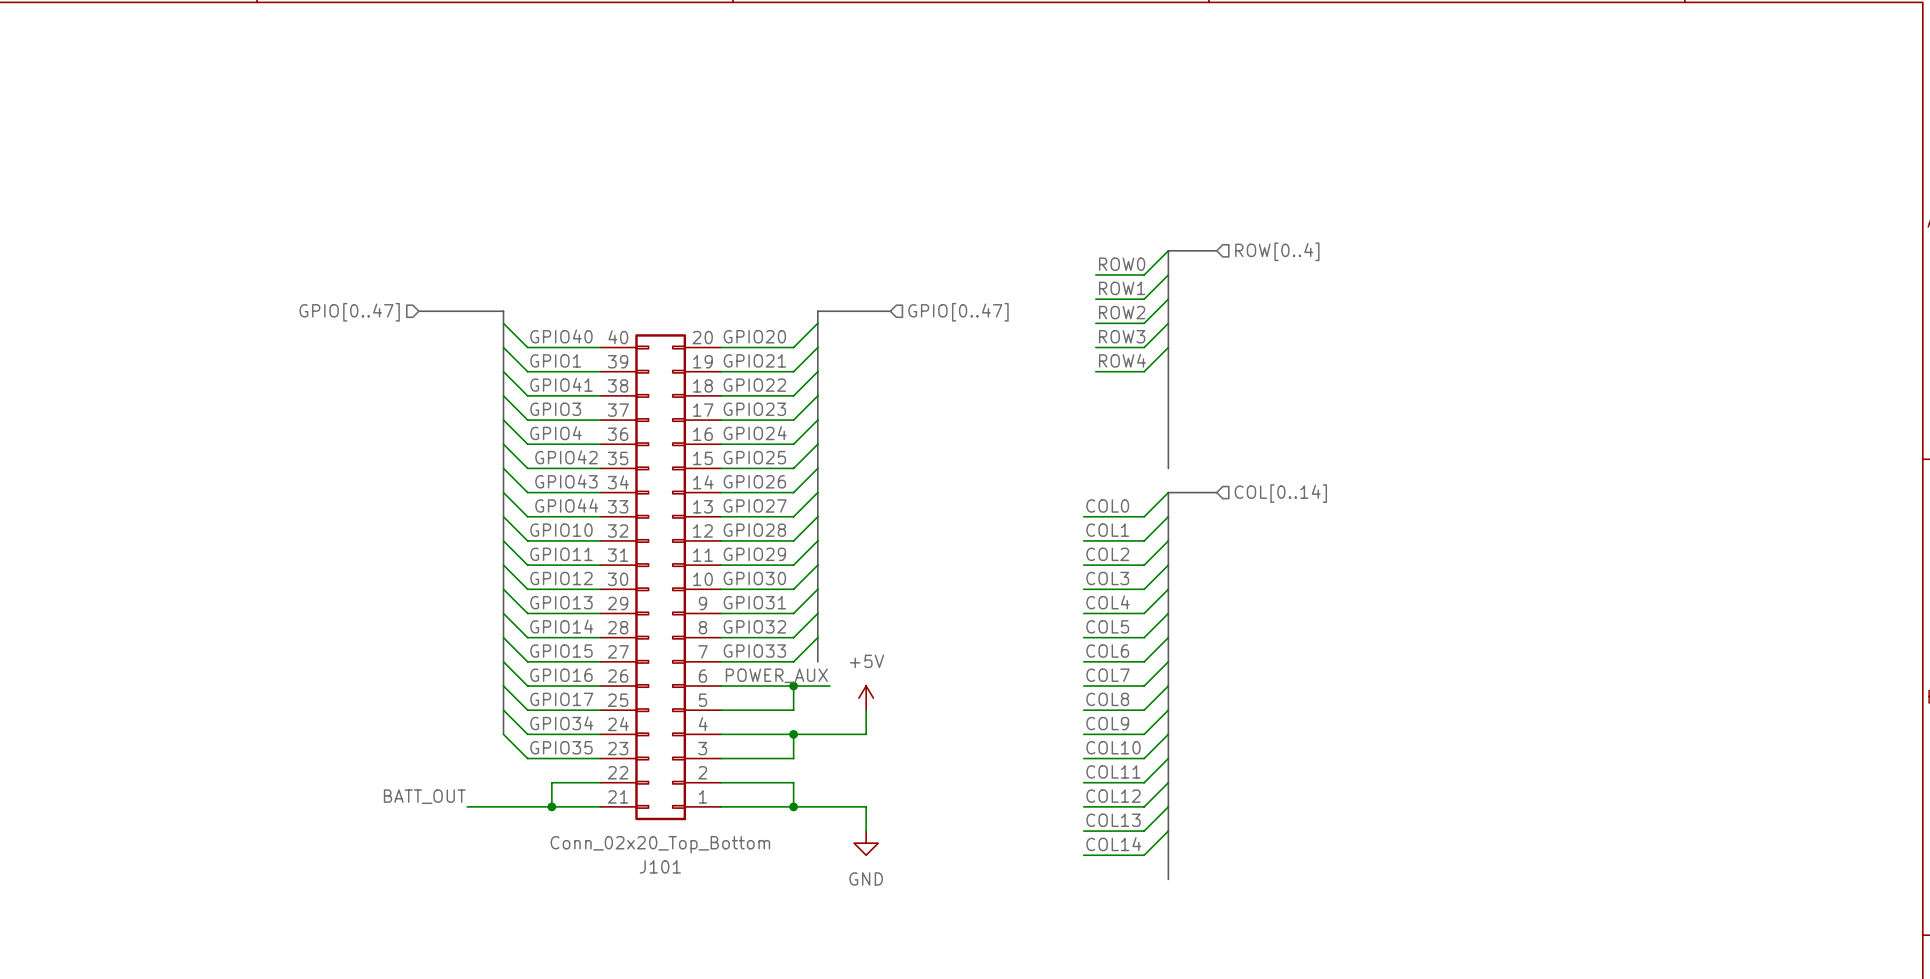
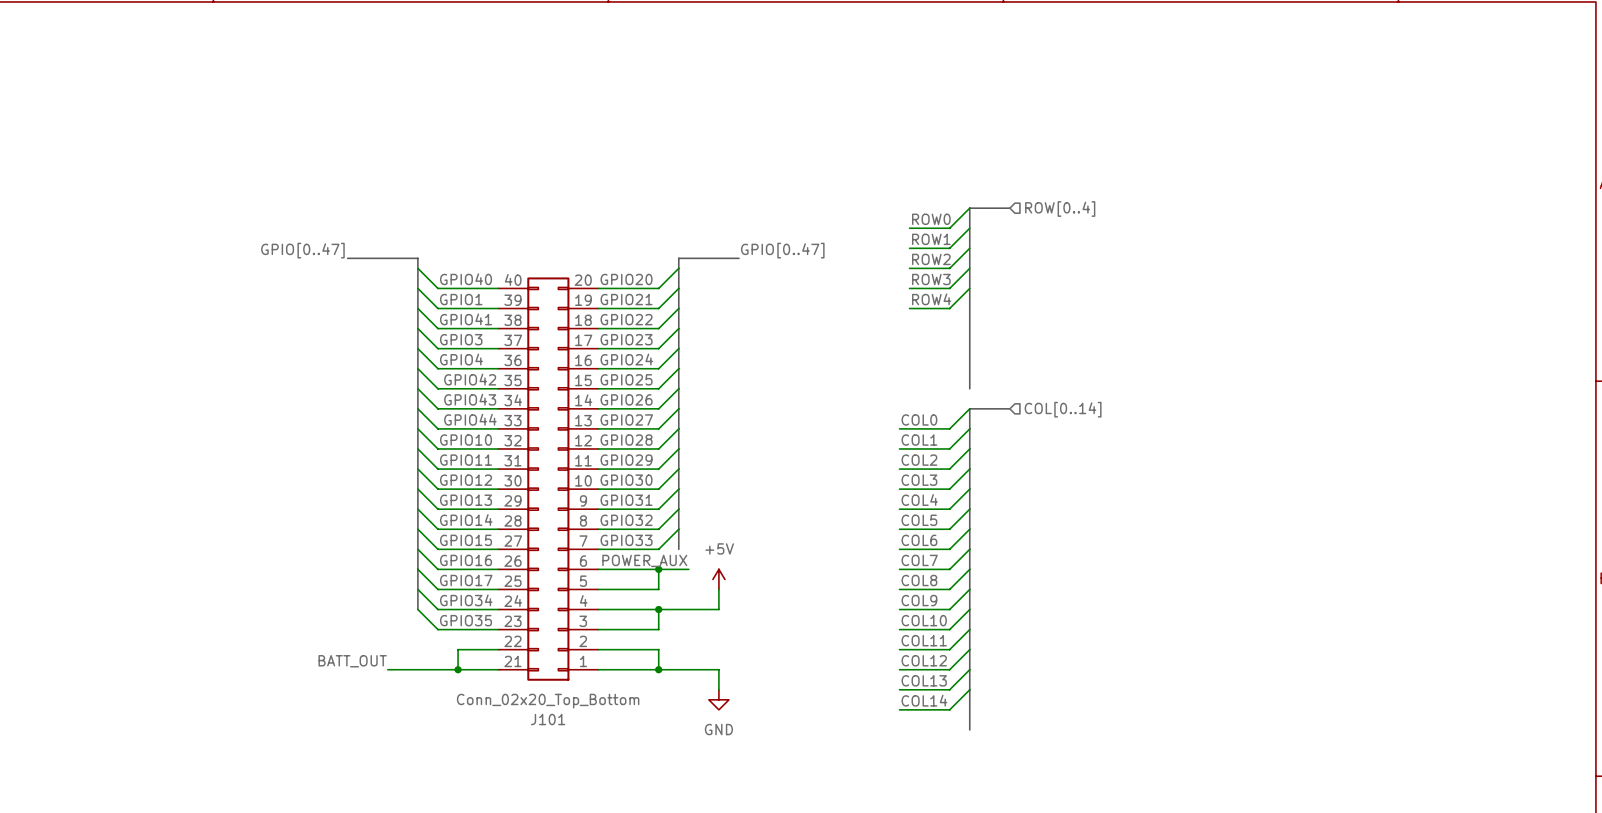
label: none -> GPIO[0..47] (302, 250)
label: none -> GPIO[0..47] (782, 250)
hierarchical label: GPIO[0..47] (349, 312) -> none
hierarchical label: GPIO[0..47] (958, 312) -> none

